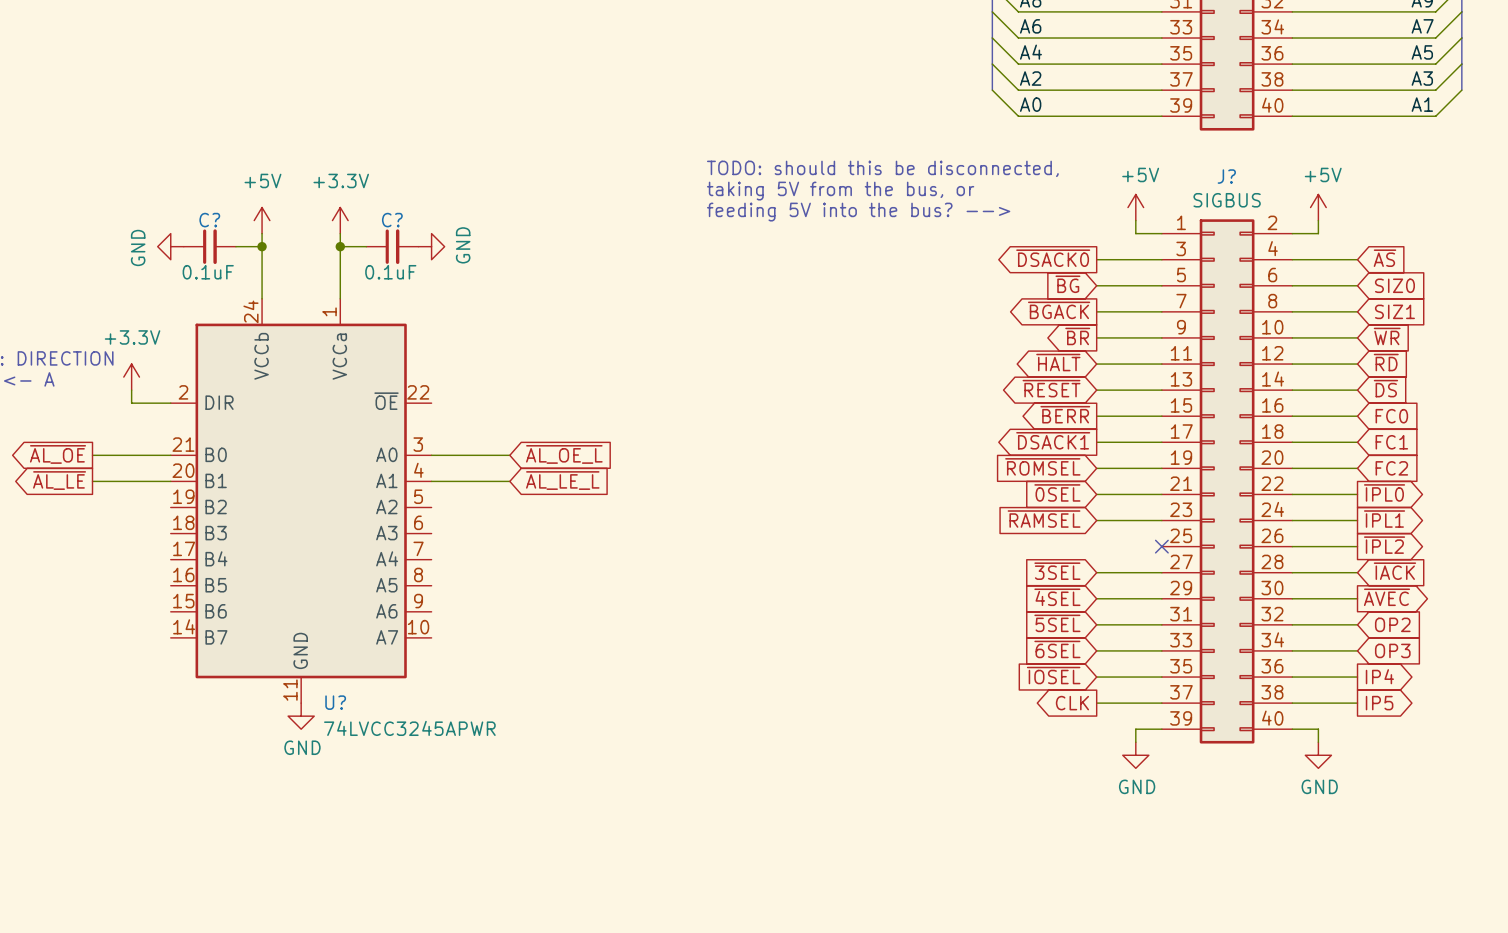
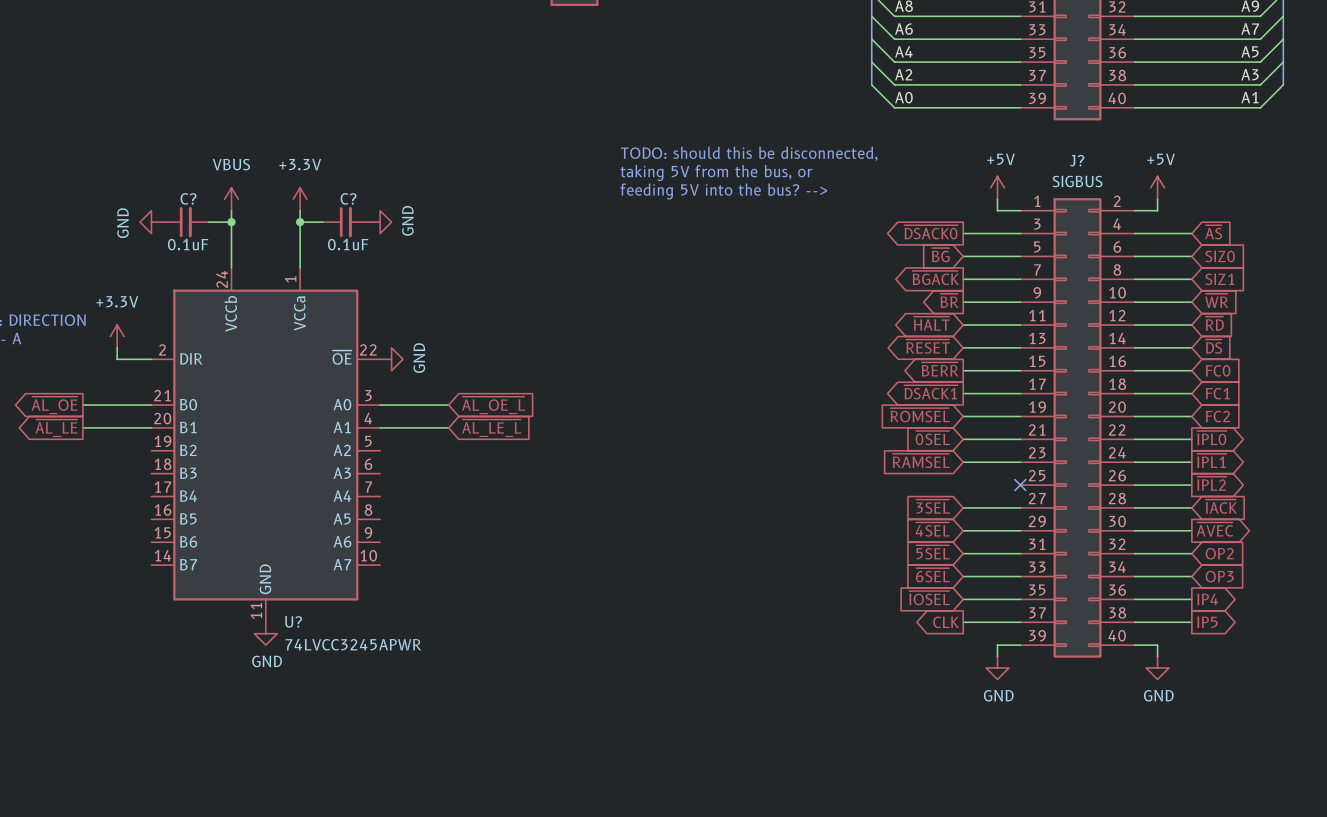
power symbol: +5V (262, 220) -> VBUS (231, 199)
power symbol: none -> GND (391, 359)

